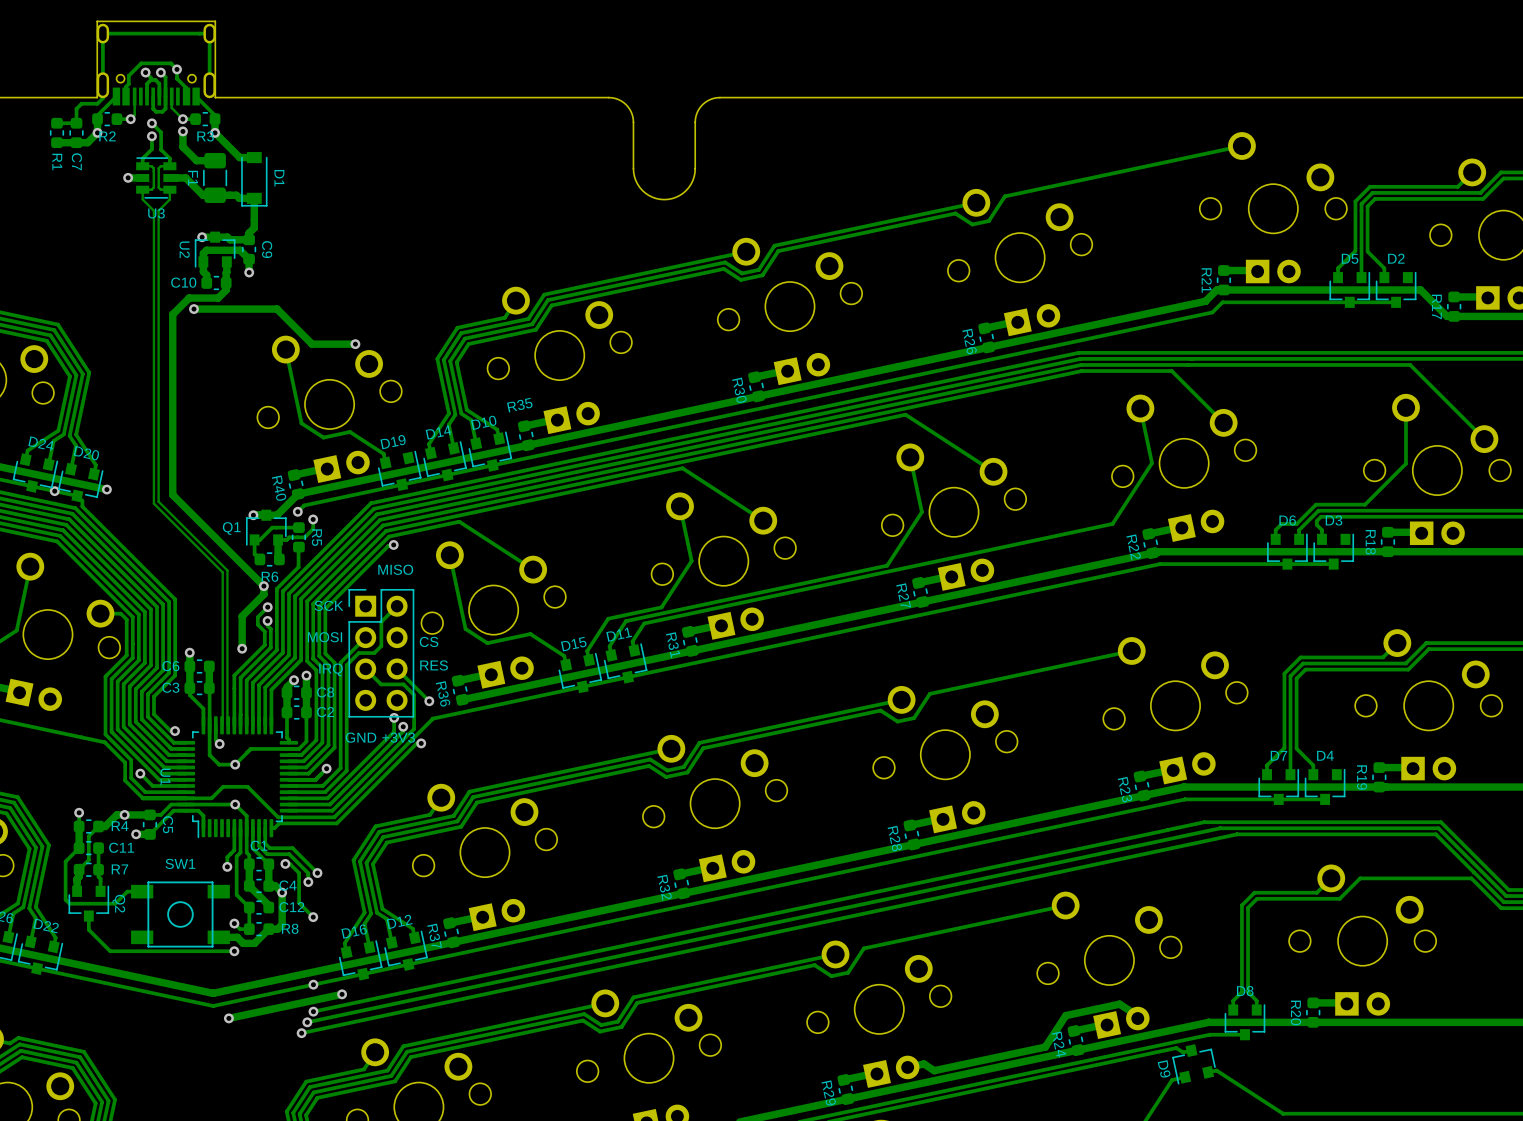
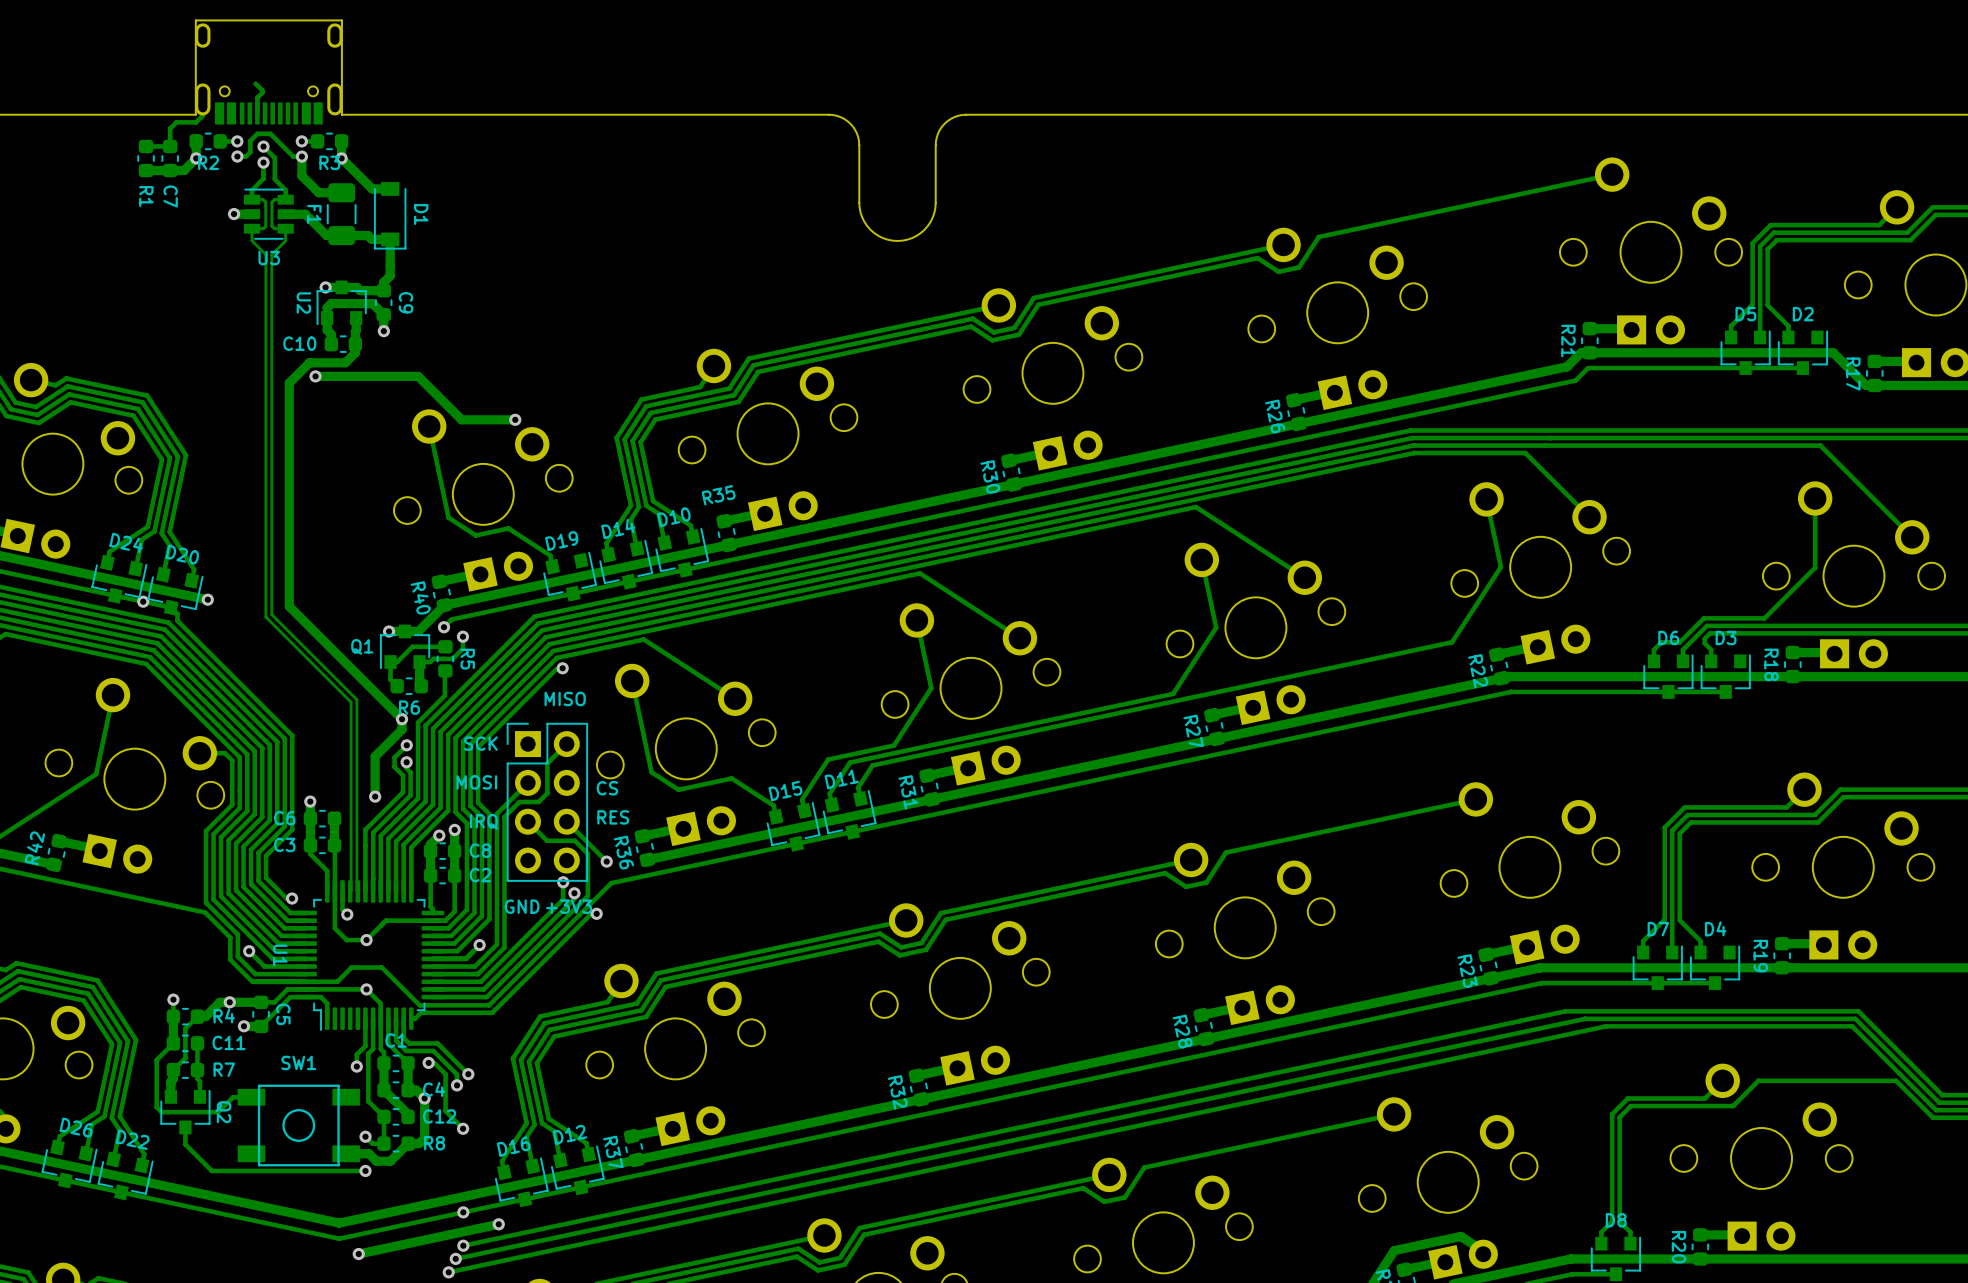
via: (176, 69) -> none
via: (145, 72) -> none
track: (160, 72) (165, 77) (165, 108) (162, 111) (156, 111) (153, 108) (153, 96) -> none
via: (160, 72) -> none
track: (150, 79) (155, 79) (159, 83) (159, 96) -> none
track: (209, 85) (209, 33) (102, 33) (102, 85) -> none
track: (116, 96) (97, 115) (97, 119) -> none
track: (134, 96) (134, 115) (130, 119) -> none
track: (171, 96) (171, 107) (182, 119) -> none
track: (186, 96) (186, 88) (176, 78) (176, 69) (170, 63) (141, 63) (128, 75) (126, 96) -> none
track: (196, 96) (215, 115) (215, 119) -> none
via: none -> (237, 156)
track: none -> (301, 156) (293, 156) (270, 133) (257, 133) (250, 140) (250, 152) (246, 156) (237, 156)

